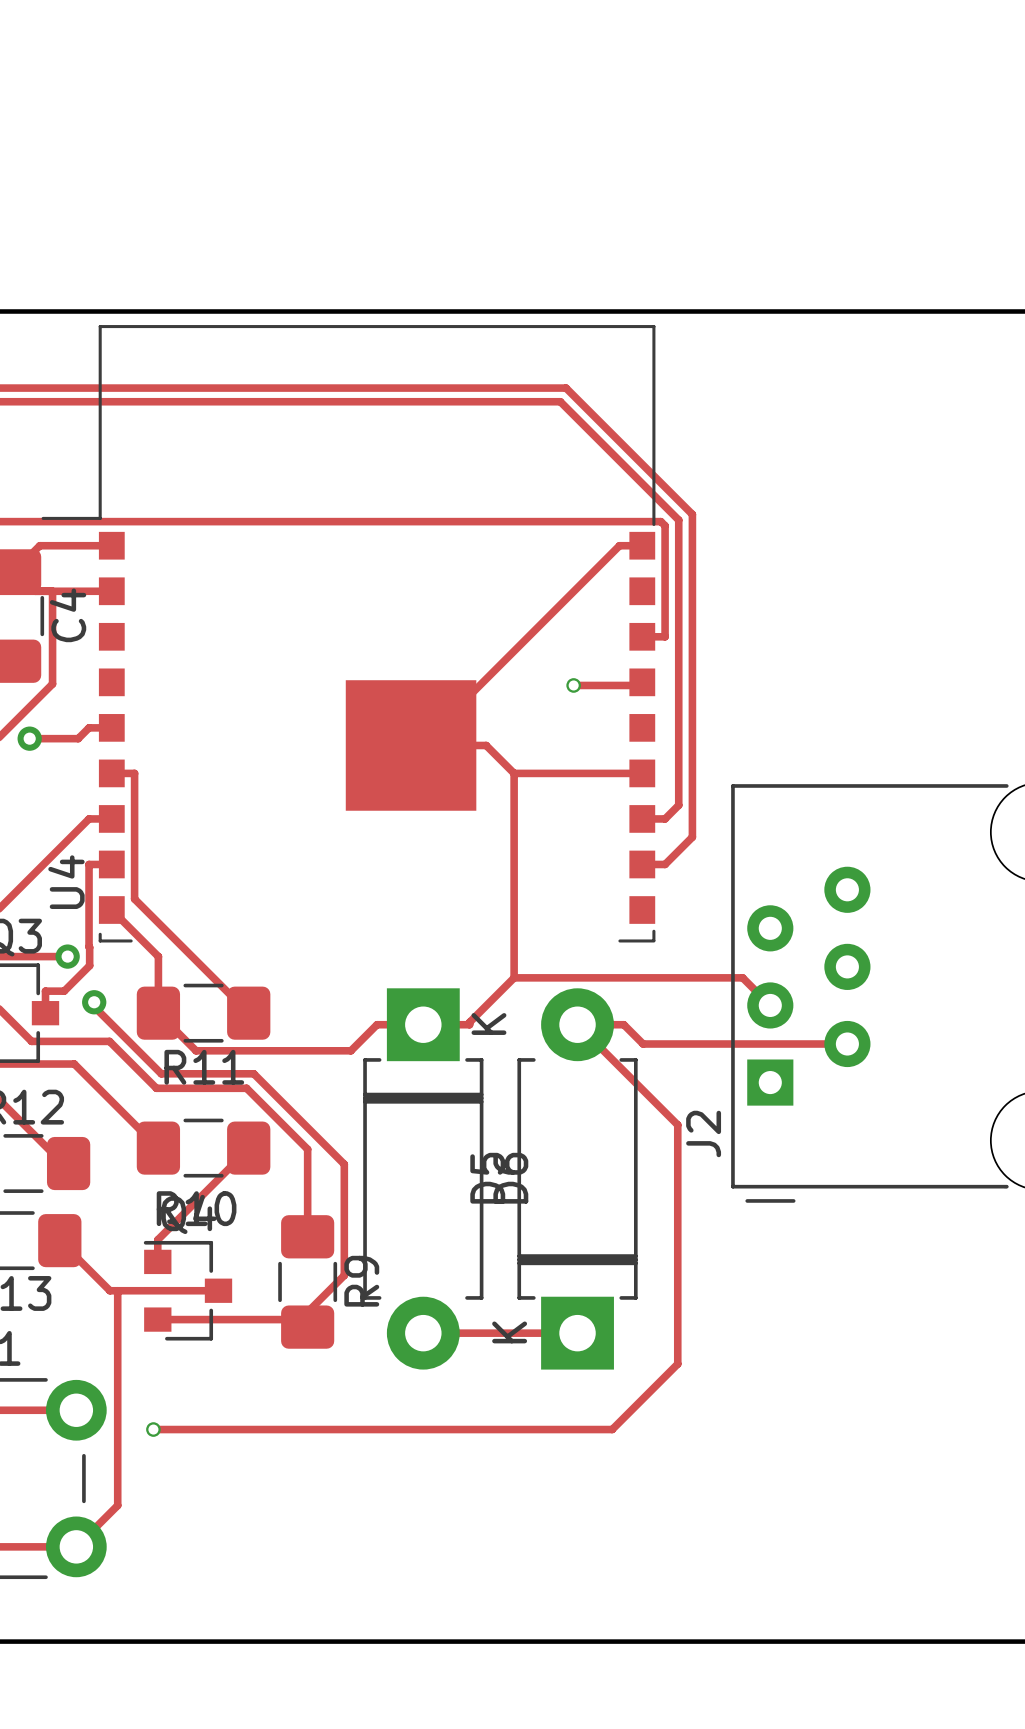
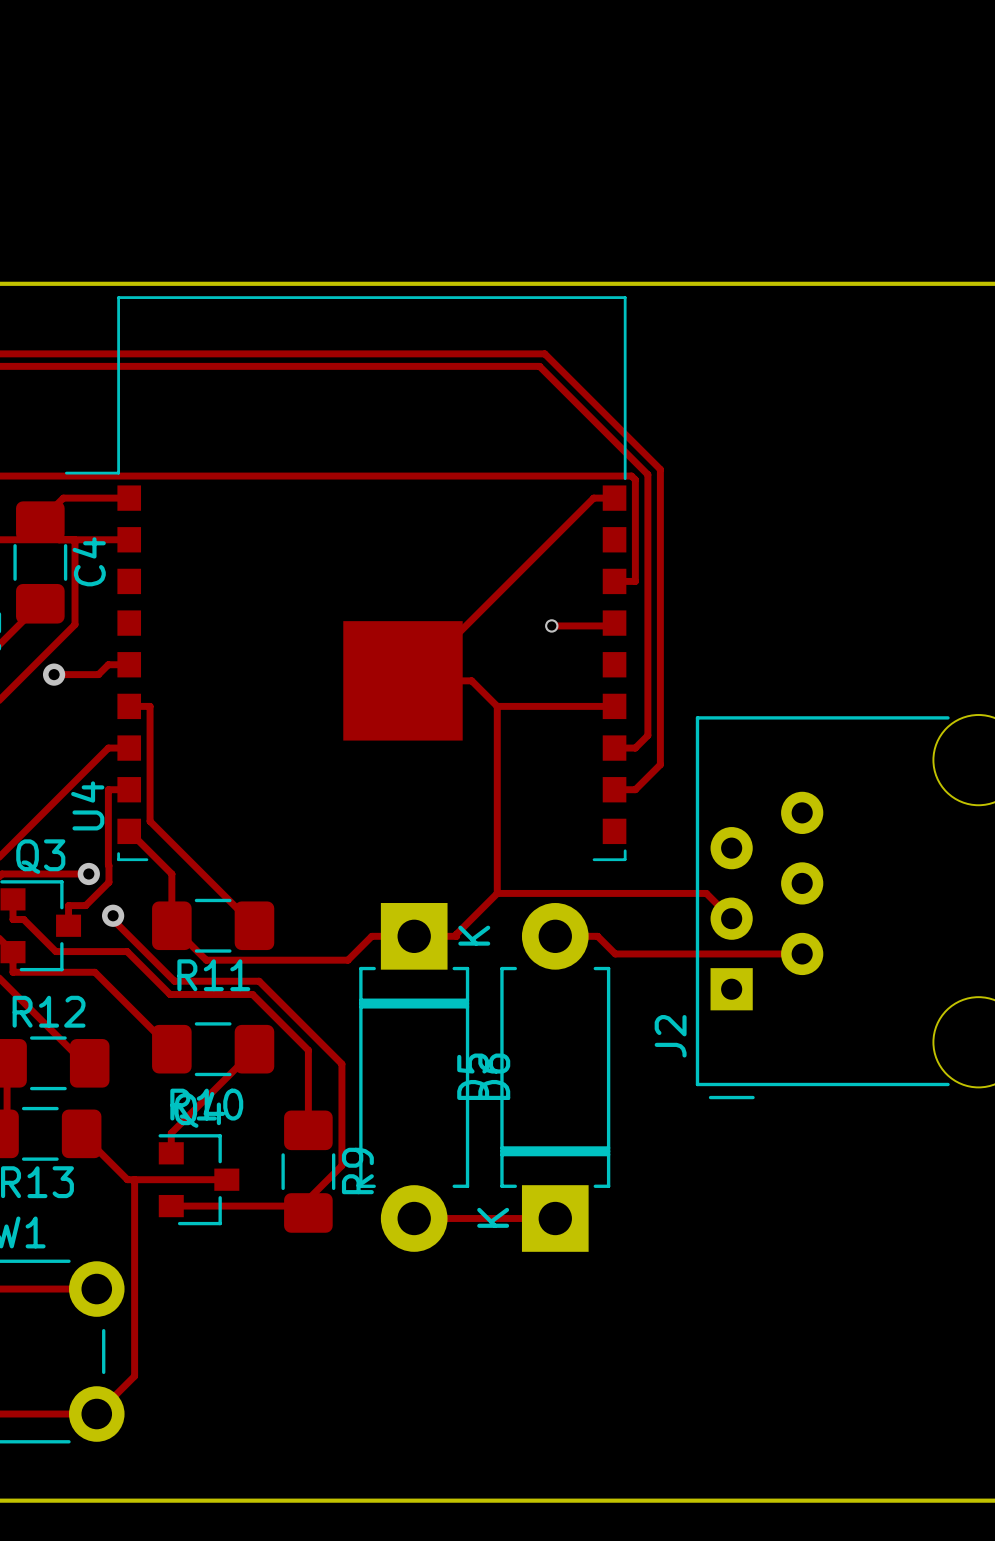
track: (577, 1024) (677, 1124) (677, 1364) (612, 1429) (153, 1429) -> none
via: (153, 1429) -> none

